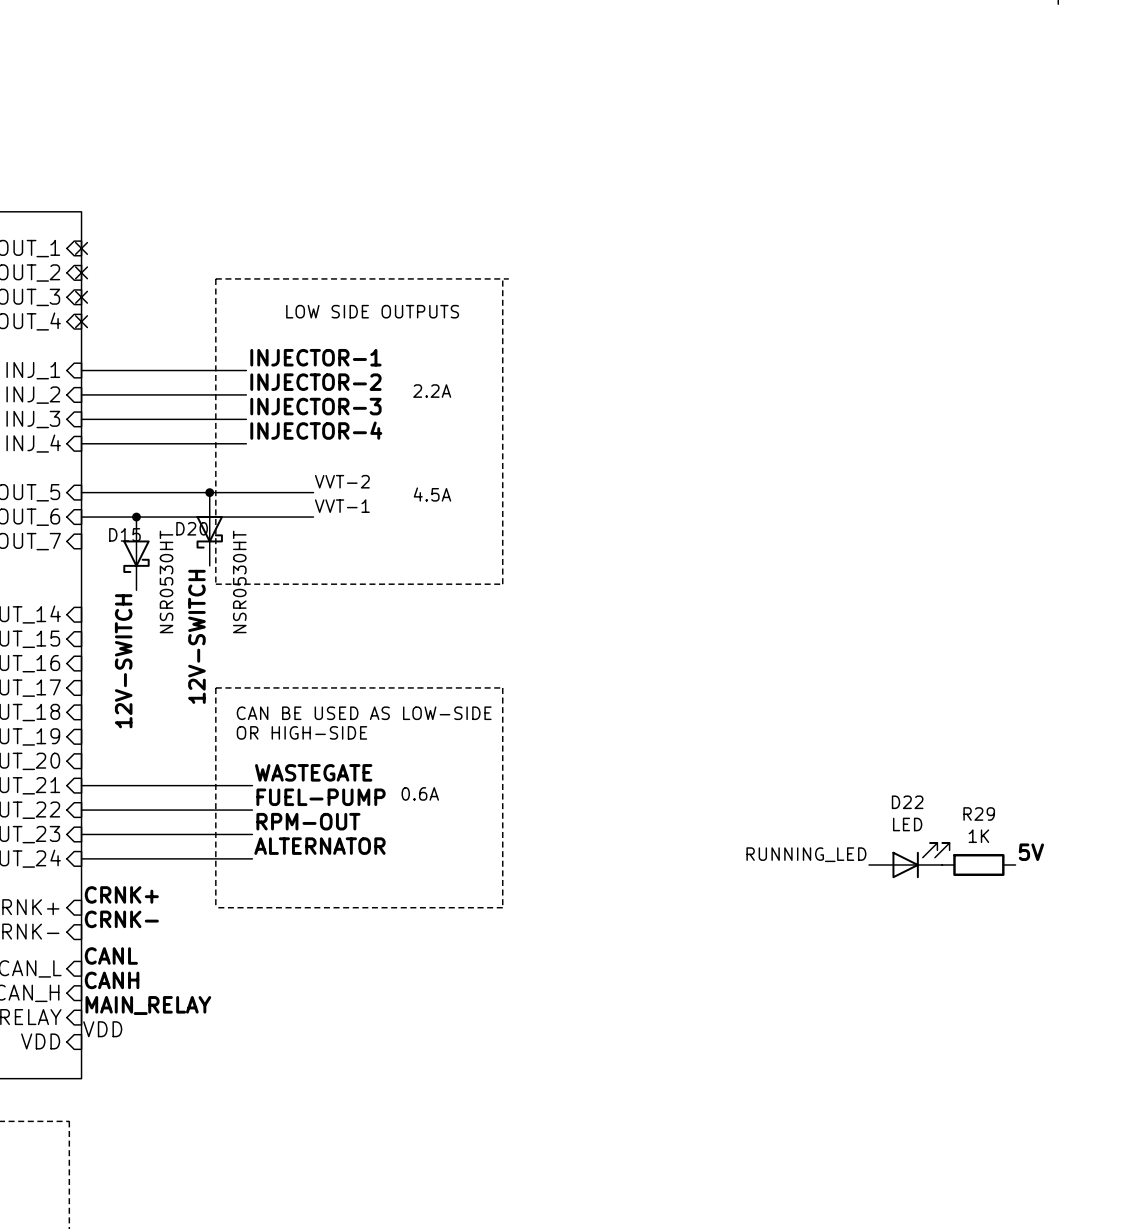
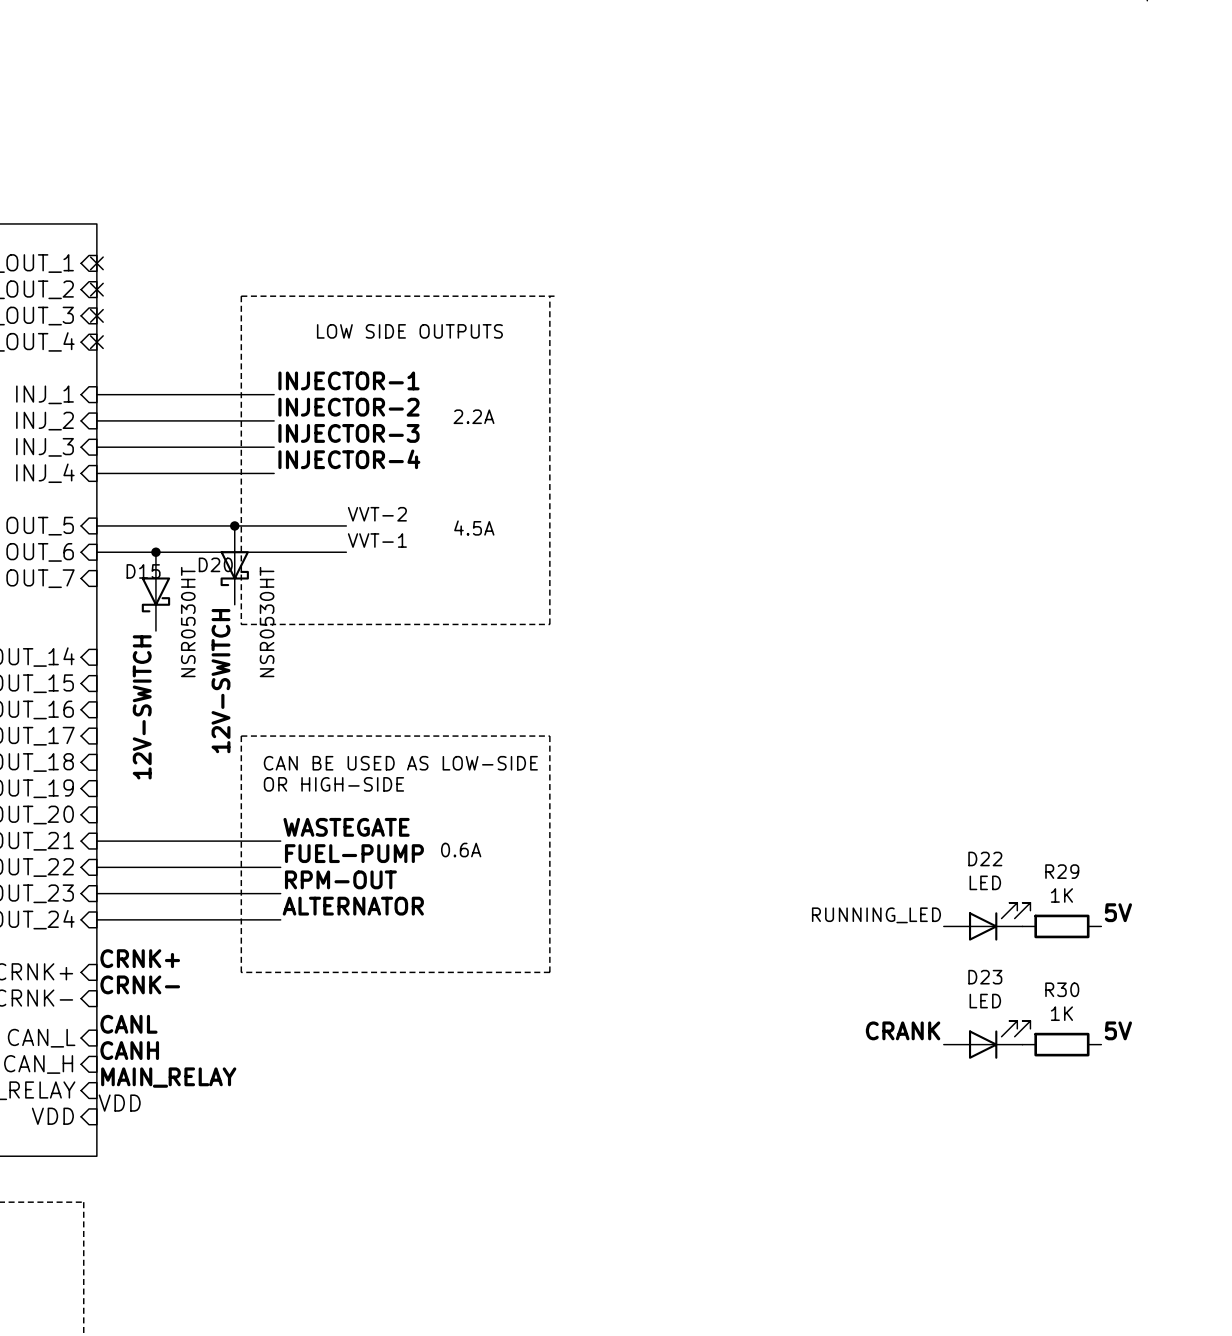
label: none -> CRANK (903, 1030)
label: none -> 5V (1118, 1030)
D23: none -> LED (987, 1039)
R30: none -> 1K (1061, 1044)

